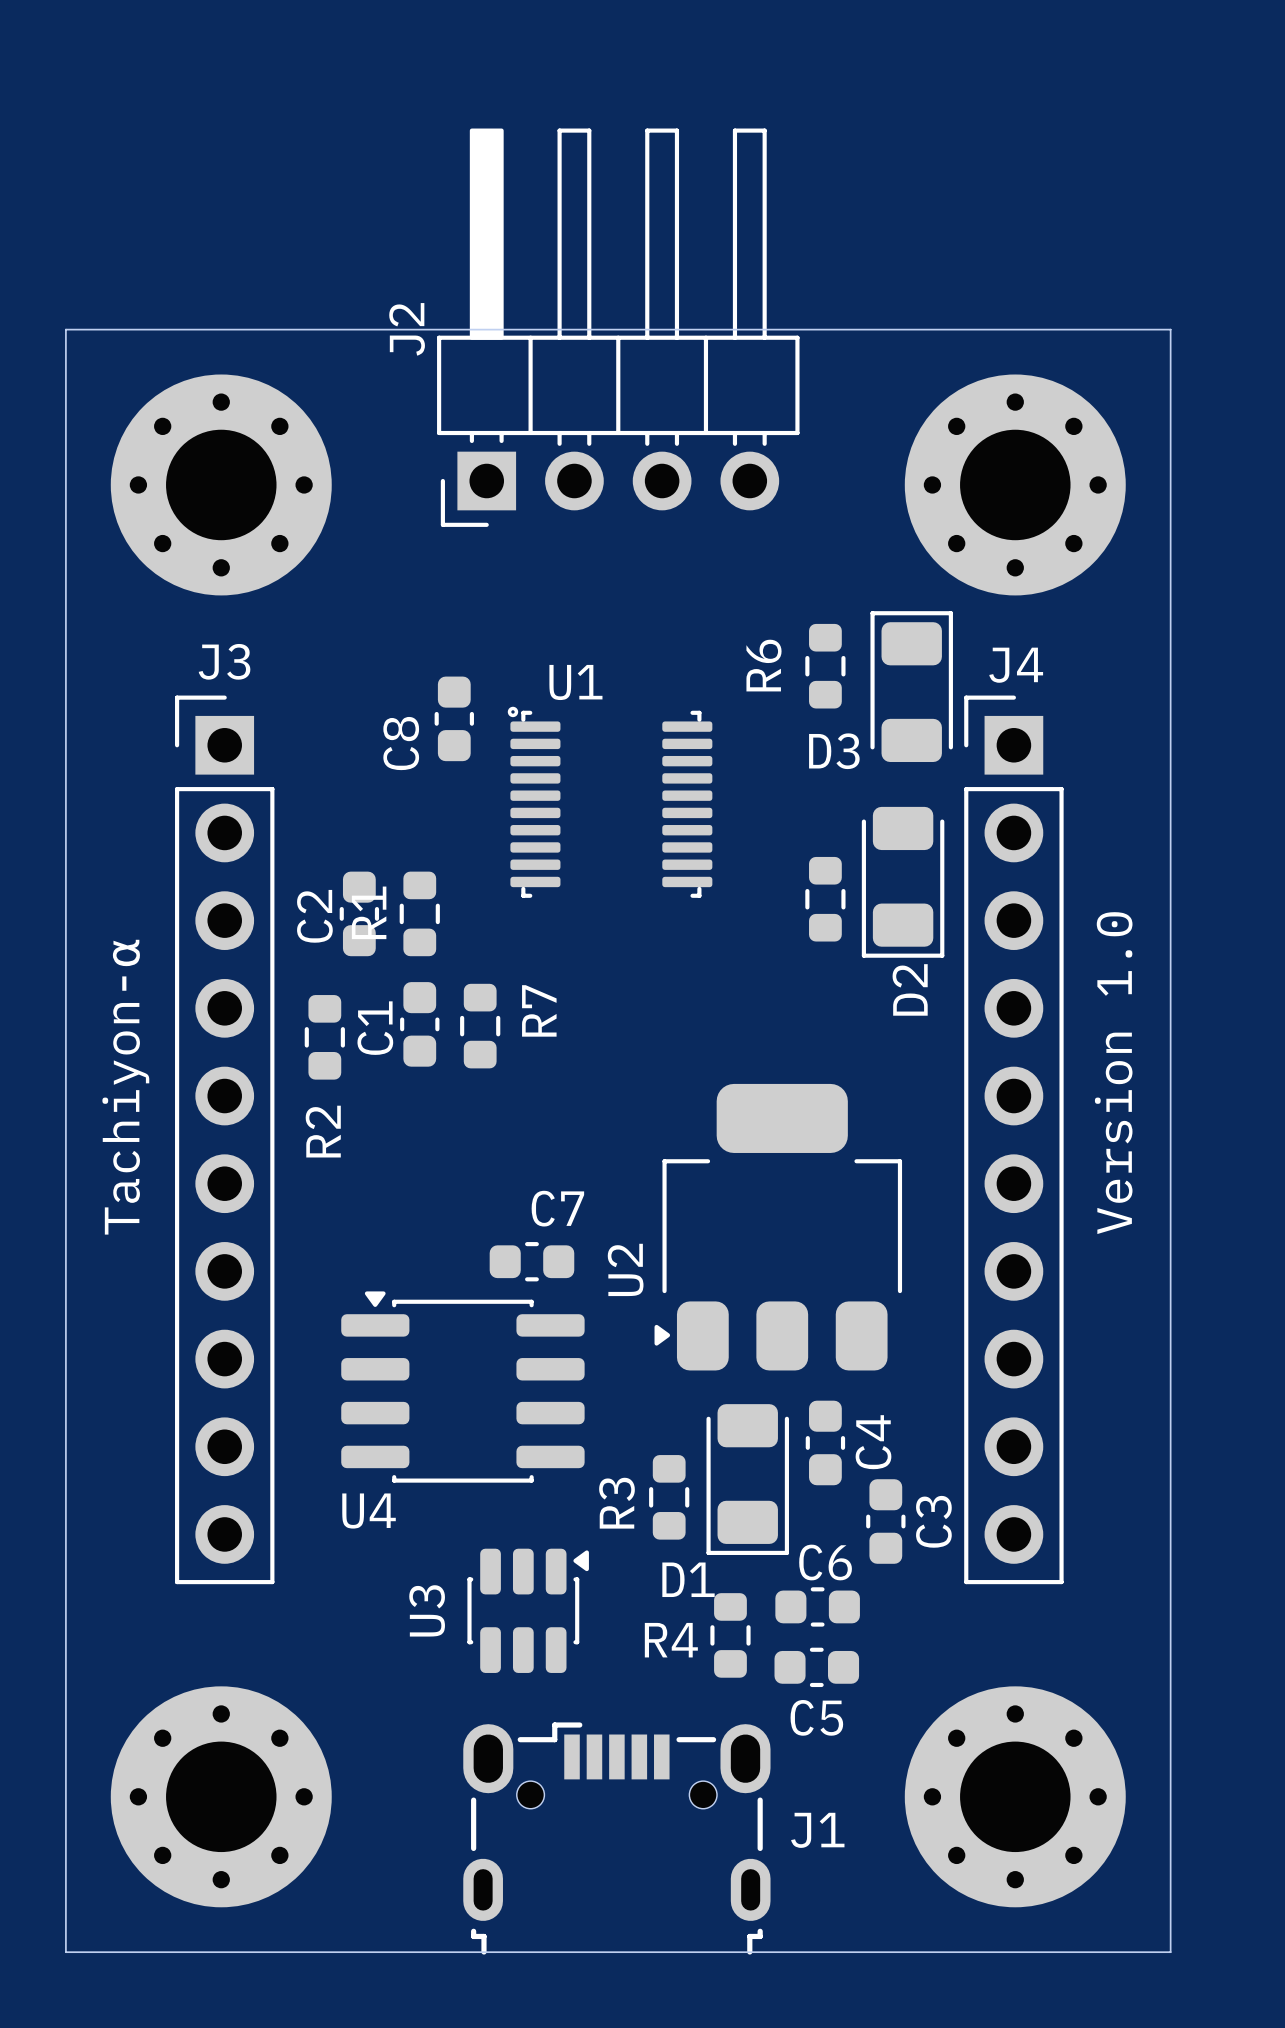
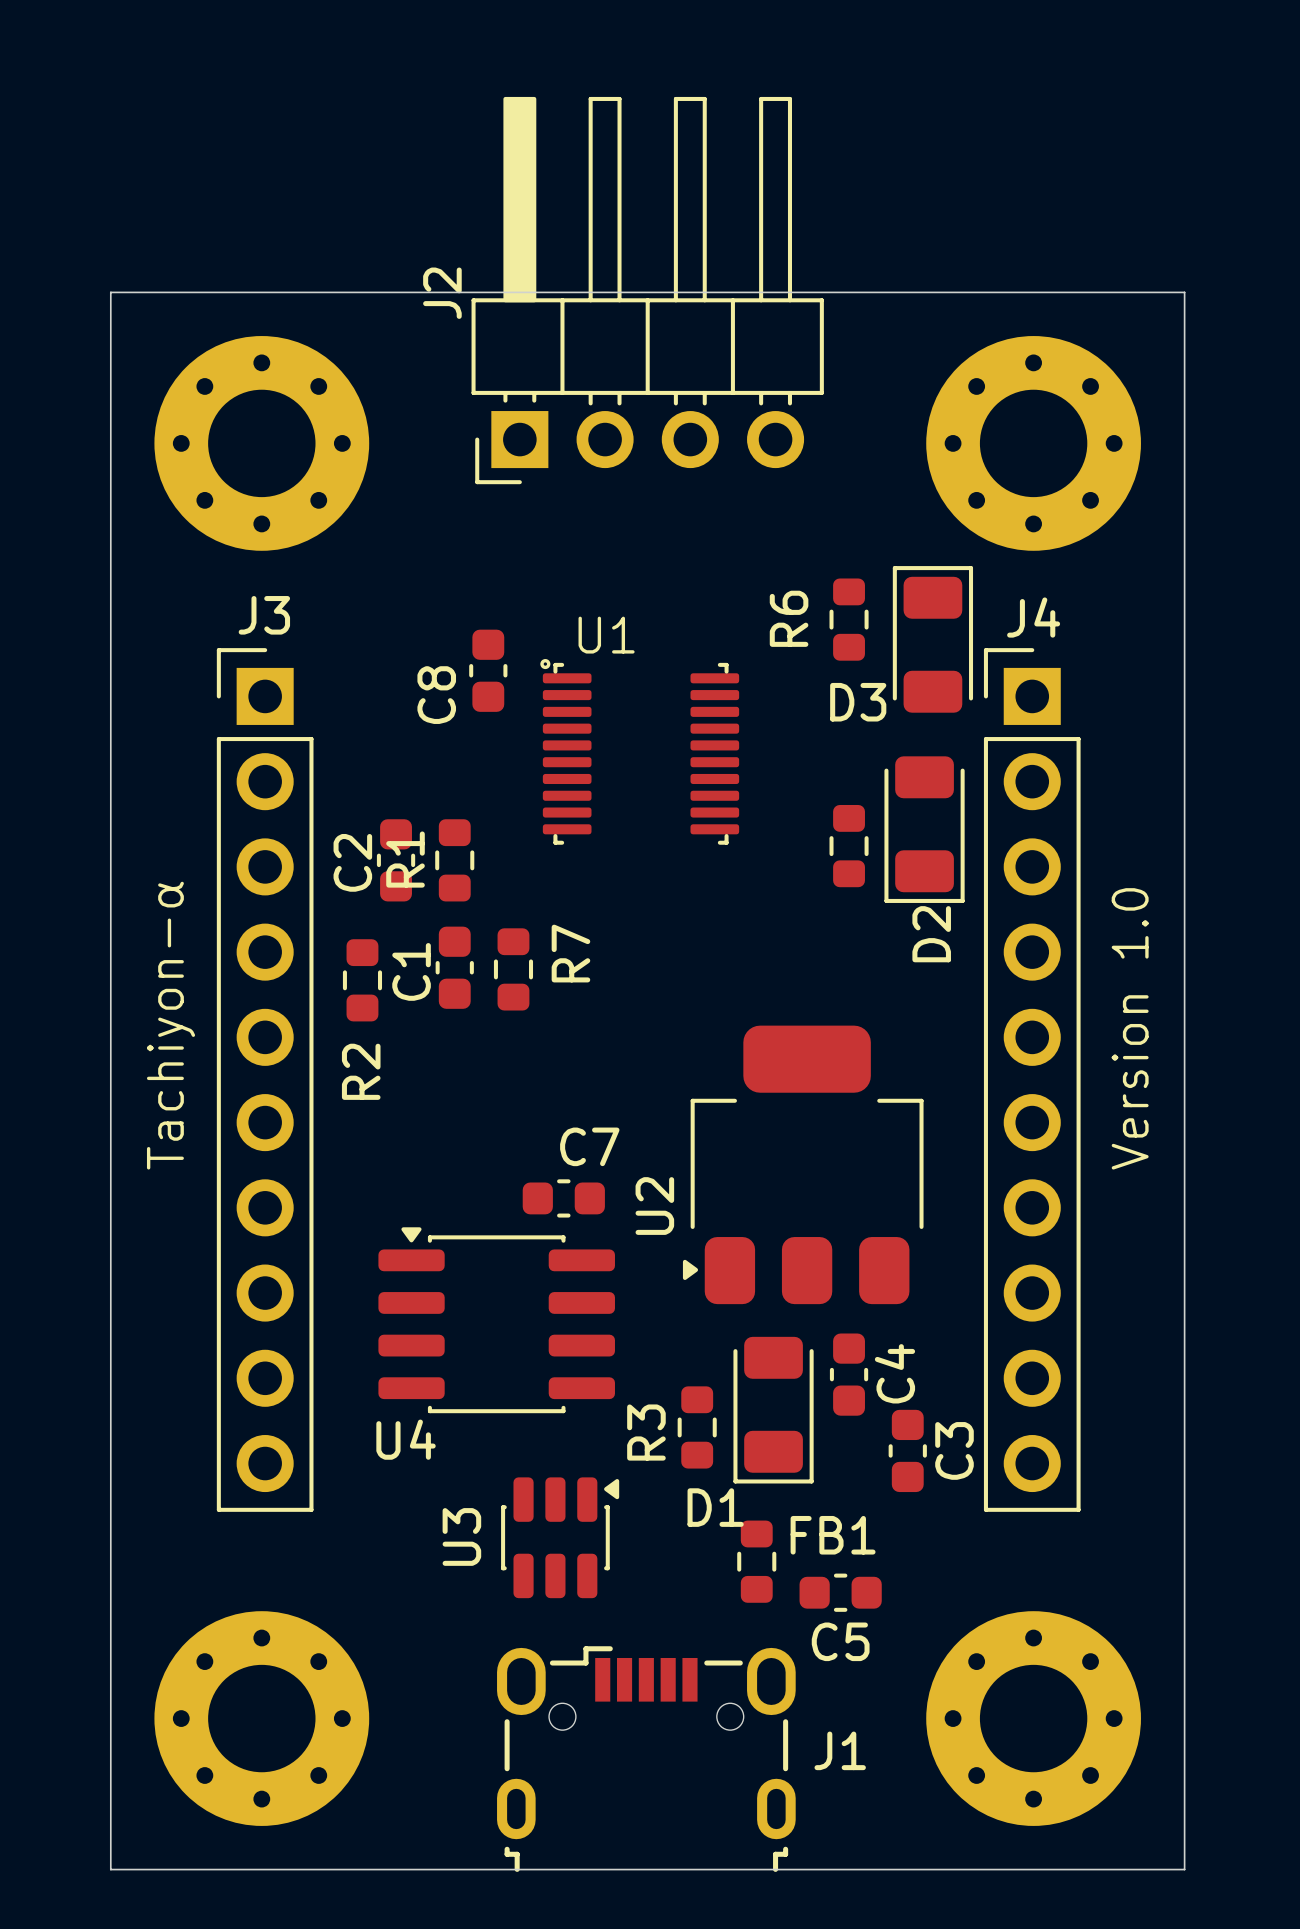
C6: (817, 1606) -> none
R4 name: R4 (671, 1640) -> FB1 (833, 1535)

